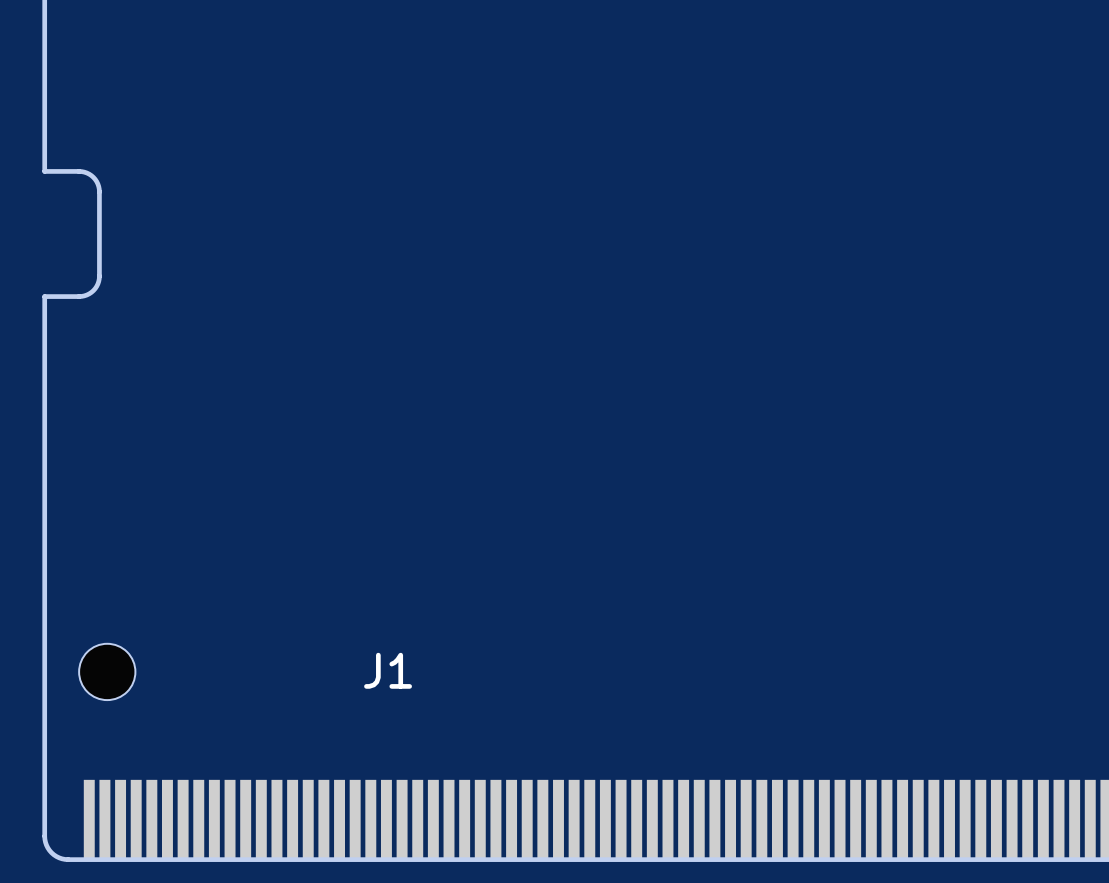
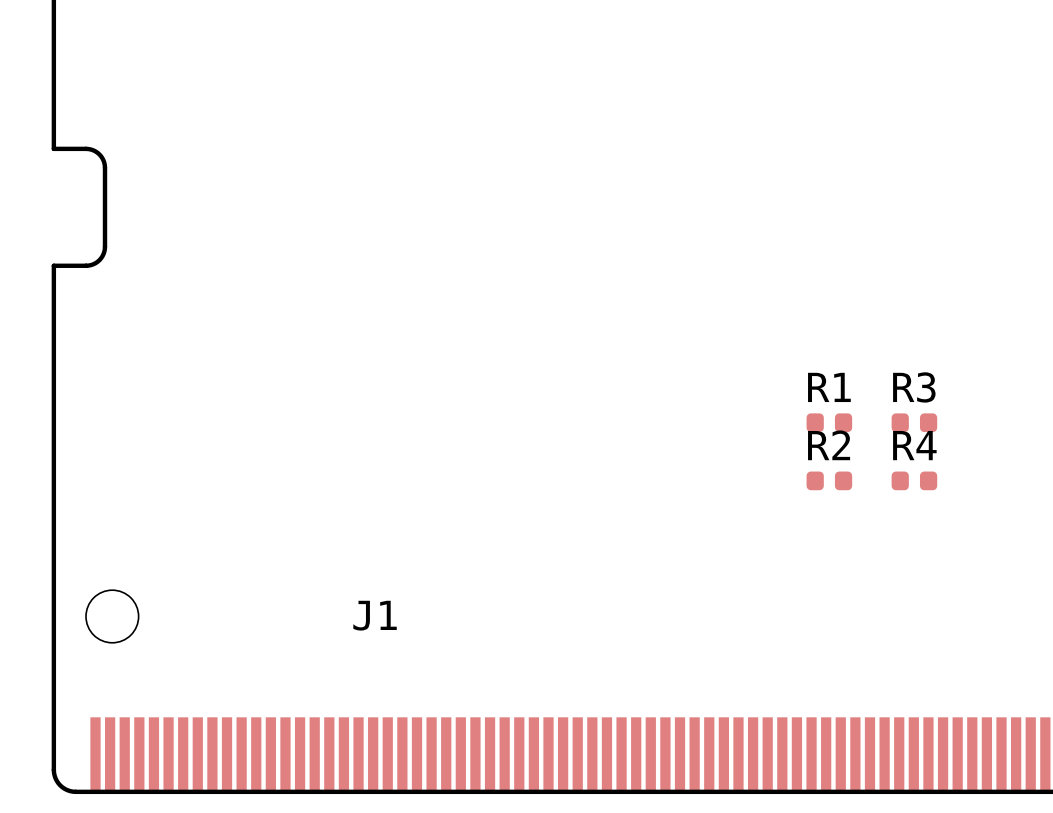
R1: none -> (829, 422)
R3: none -> (914, 422)
R2: none -> (829, 480)
R4: none -> (914, 480)

